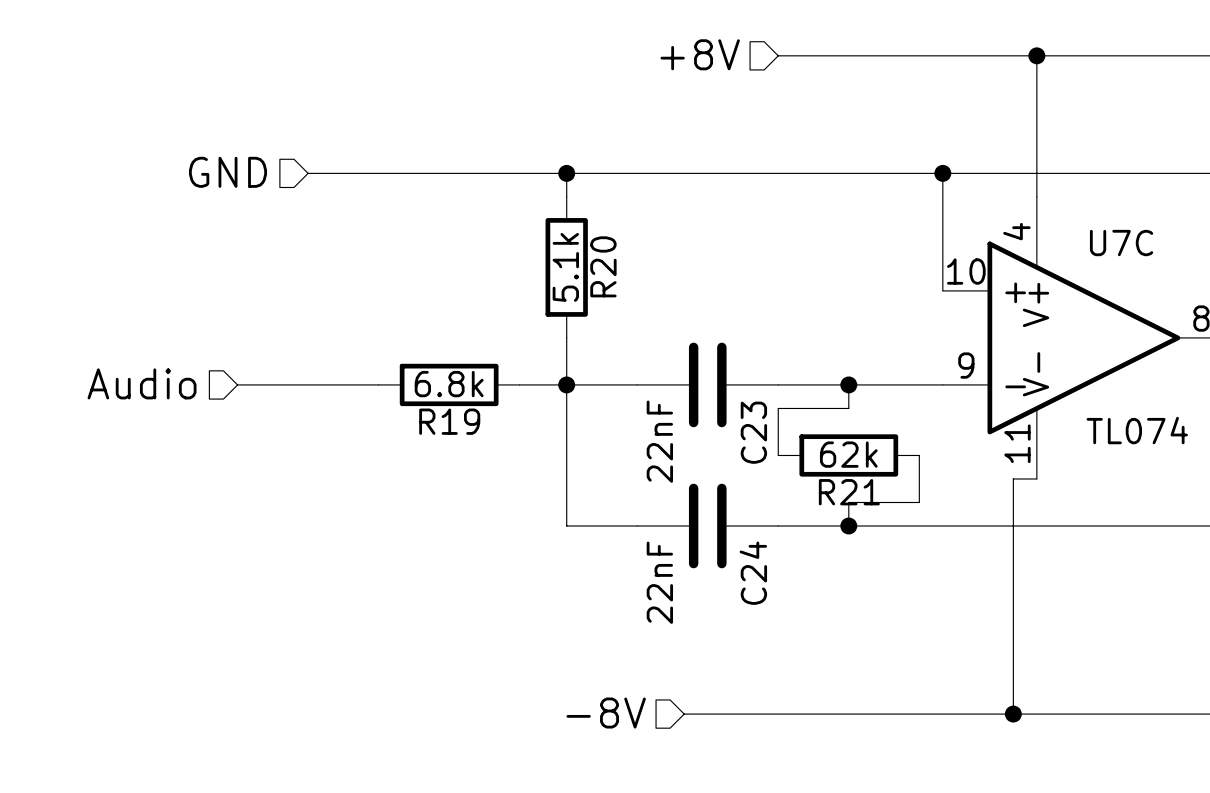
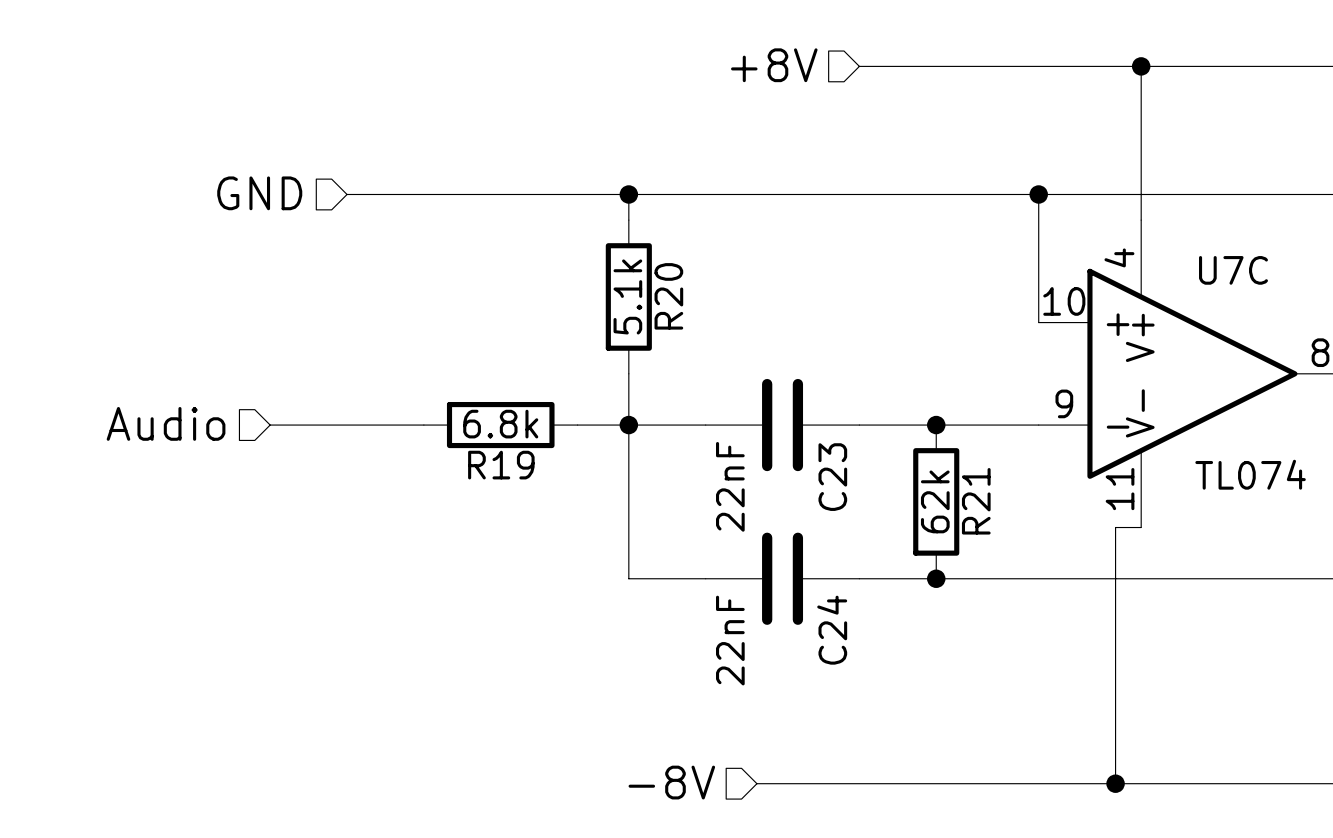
wire: (848, 384) (848, 408) (778, 408) (778, 455) -> none
R21 rotation: 0° (848, 455) -> 90° clockwise (936, 501)
wire: (919, 455) (919, 502) (848, 502) (848, 526) -> none
R21 name position: R21 (849, 492) -> R21 (976, 501)

